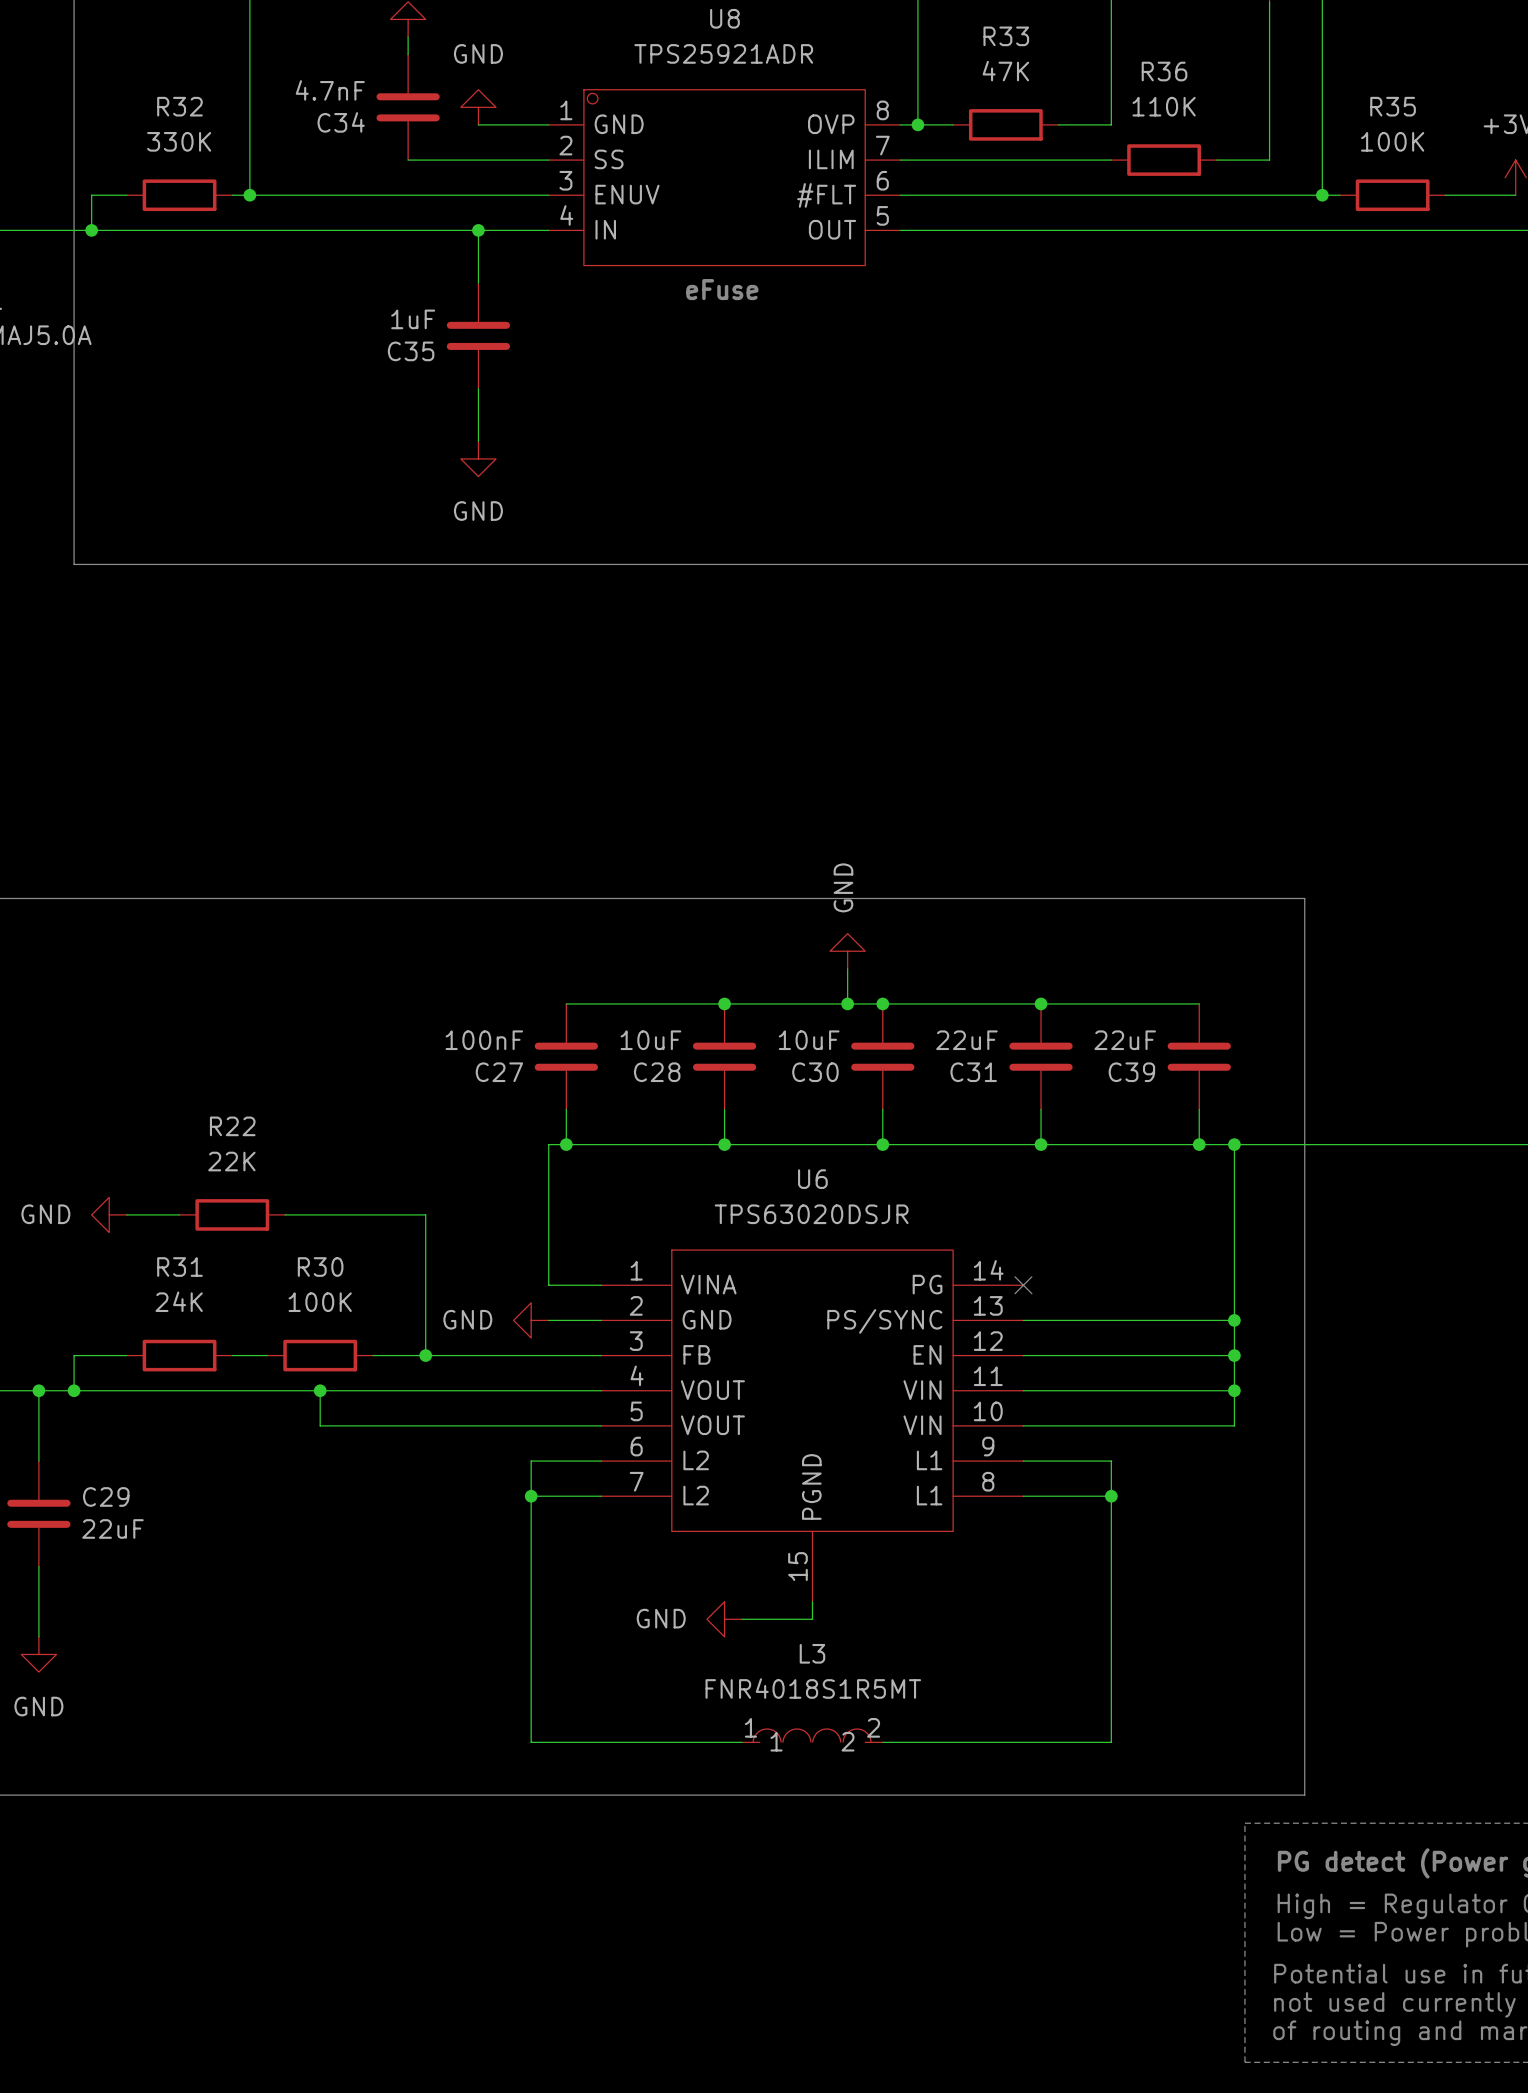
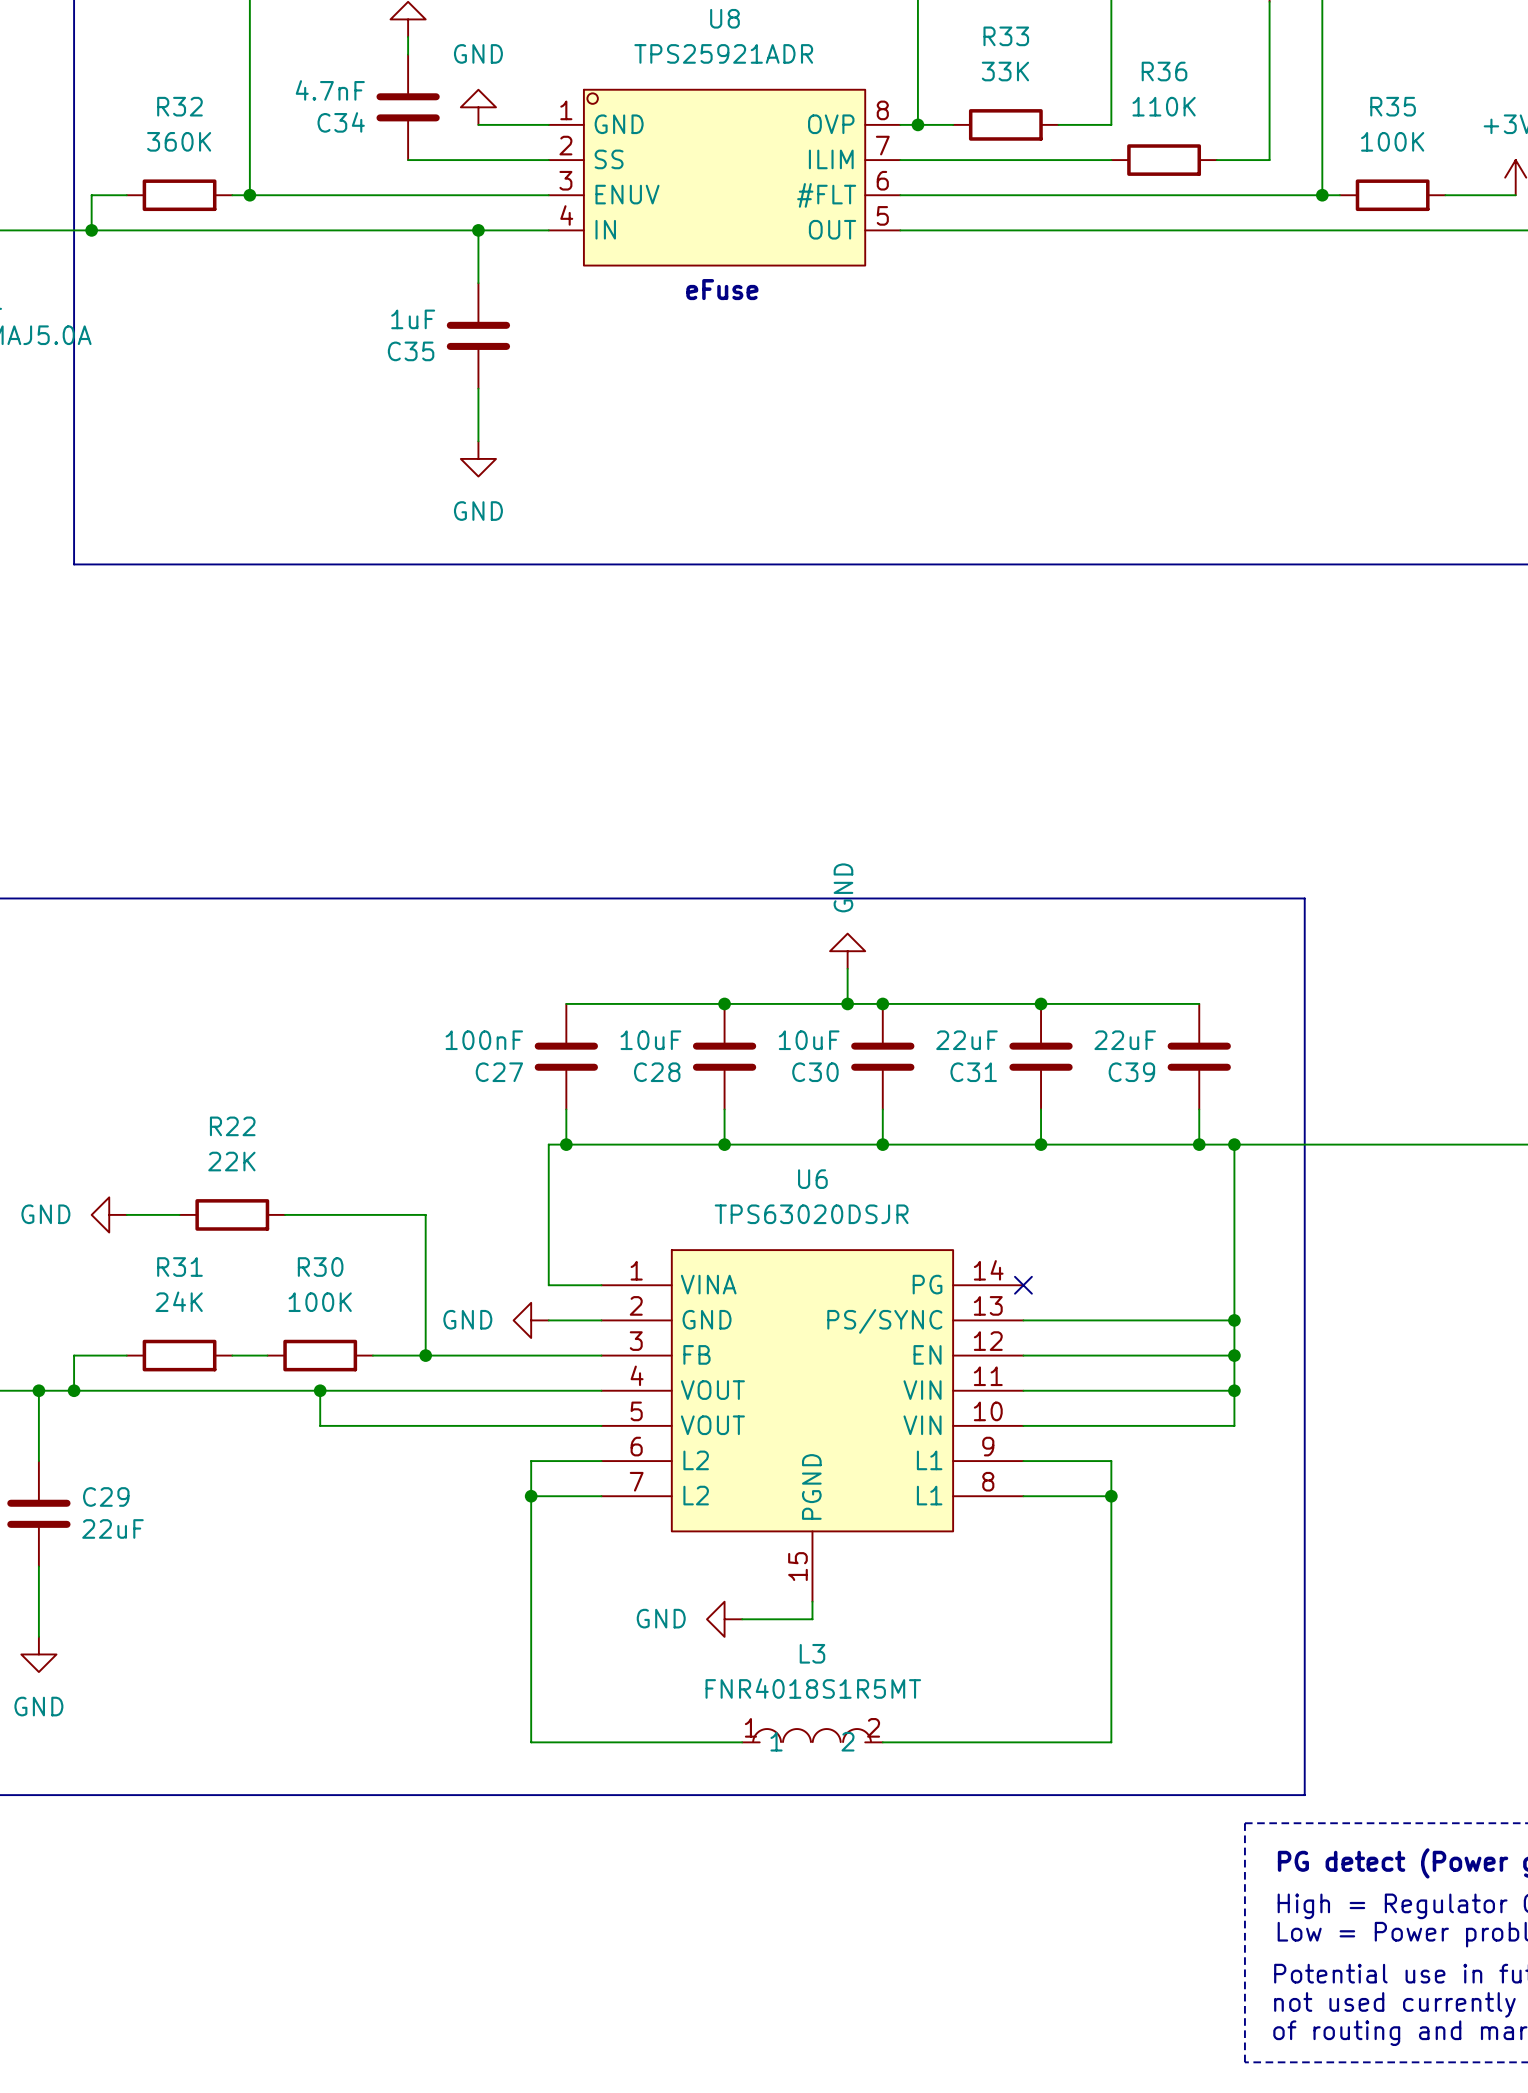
R33 value: 47K (1005, 71) -> 33K (1005, 71)
R32 value: 330K (179, 141) -> 360K (179, 141)

